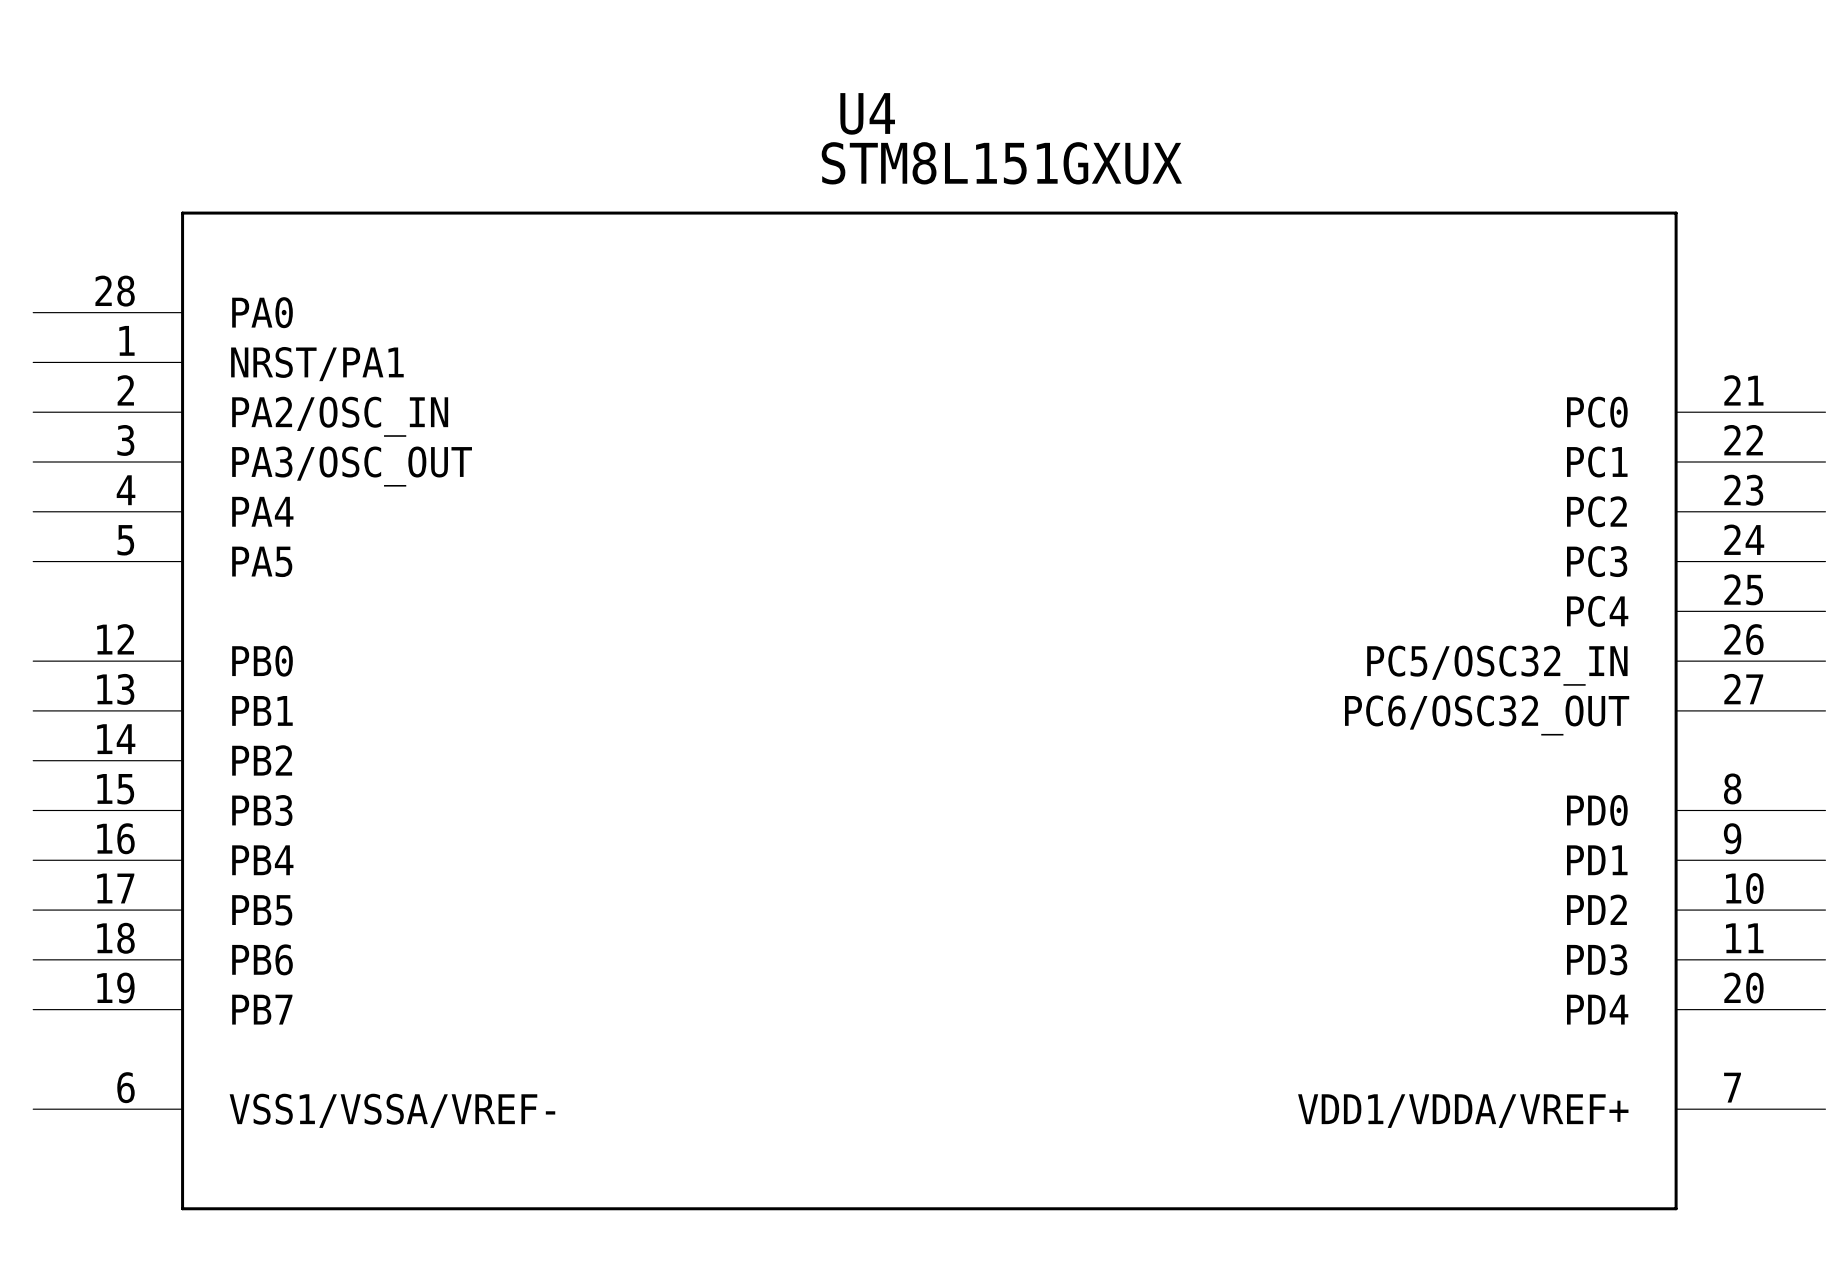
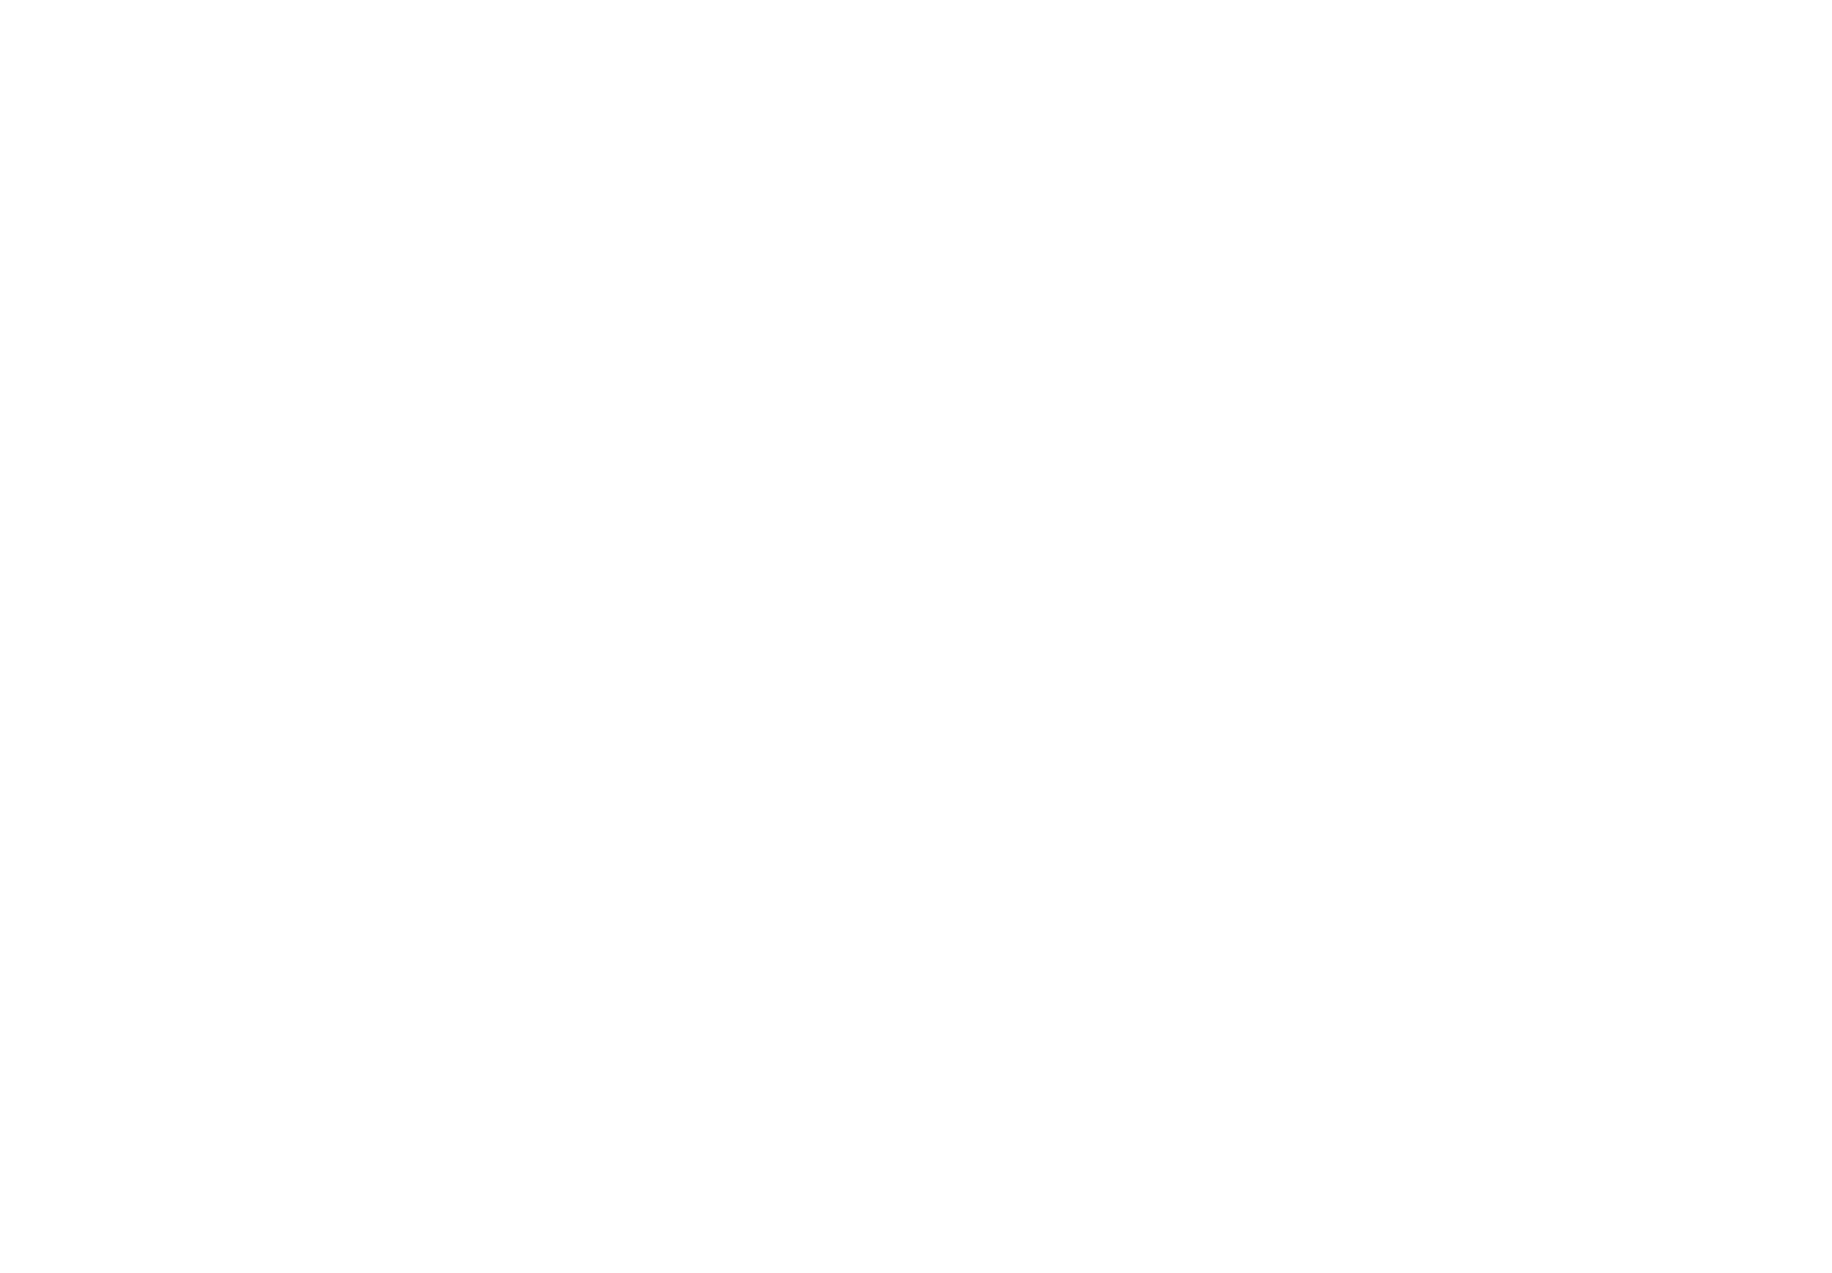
U4: STM8L151GXUX (929, 710) -> none

